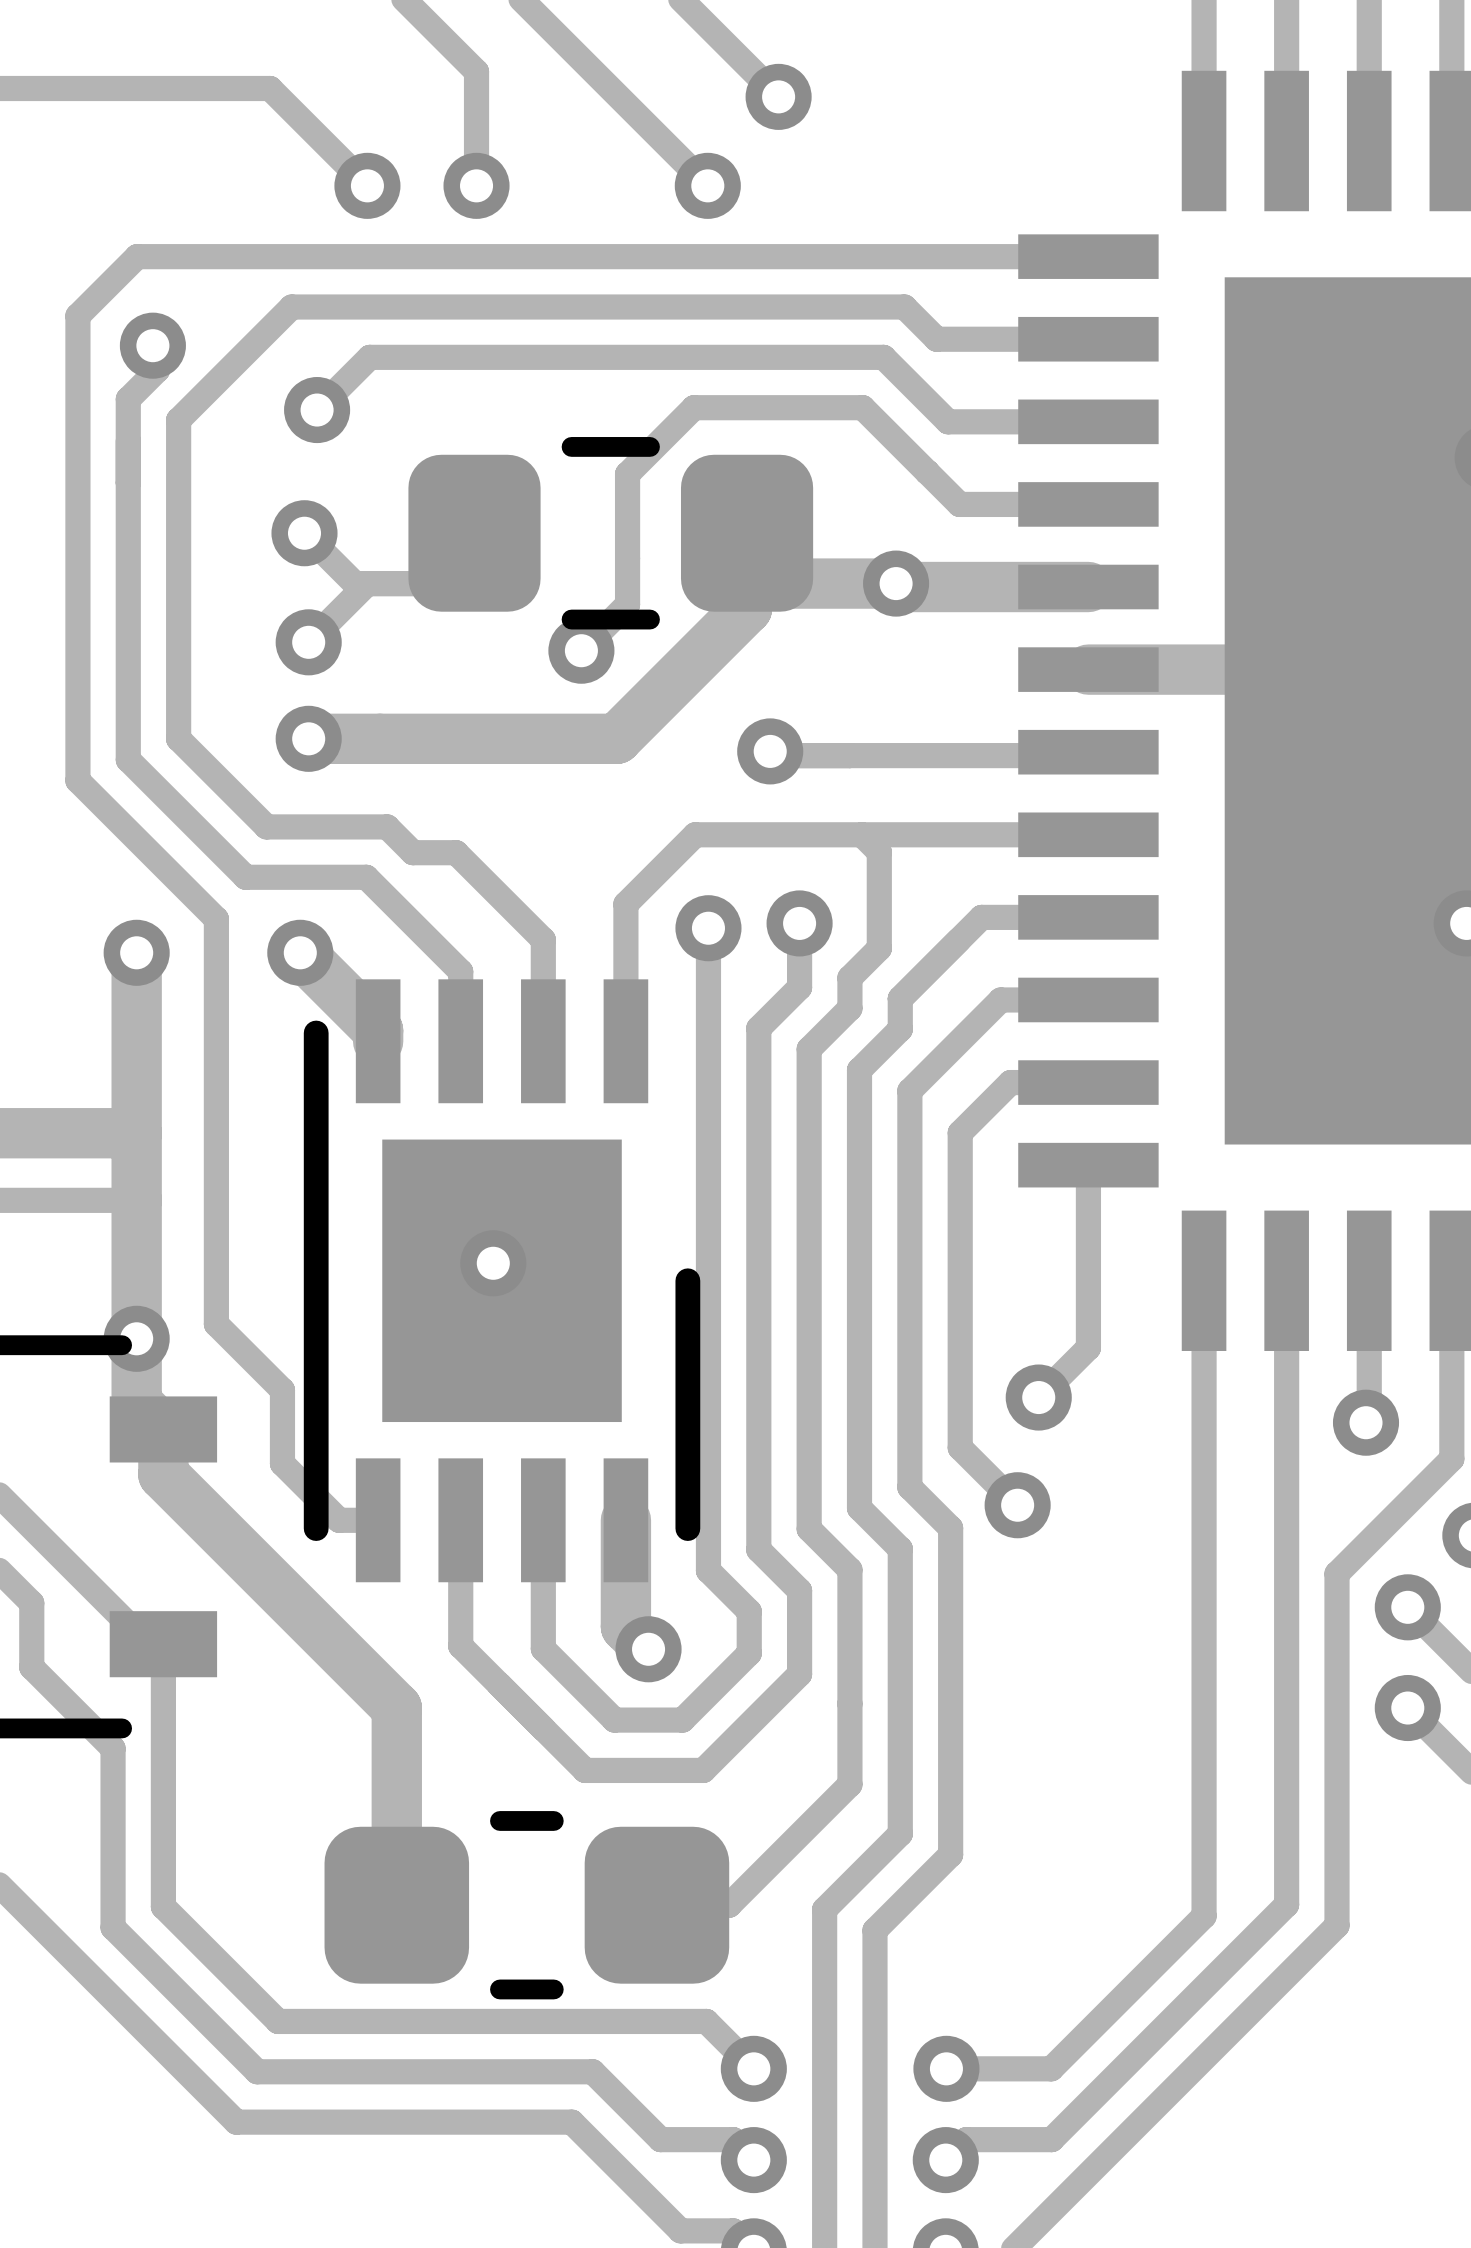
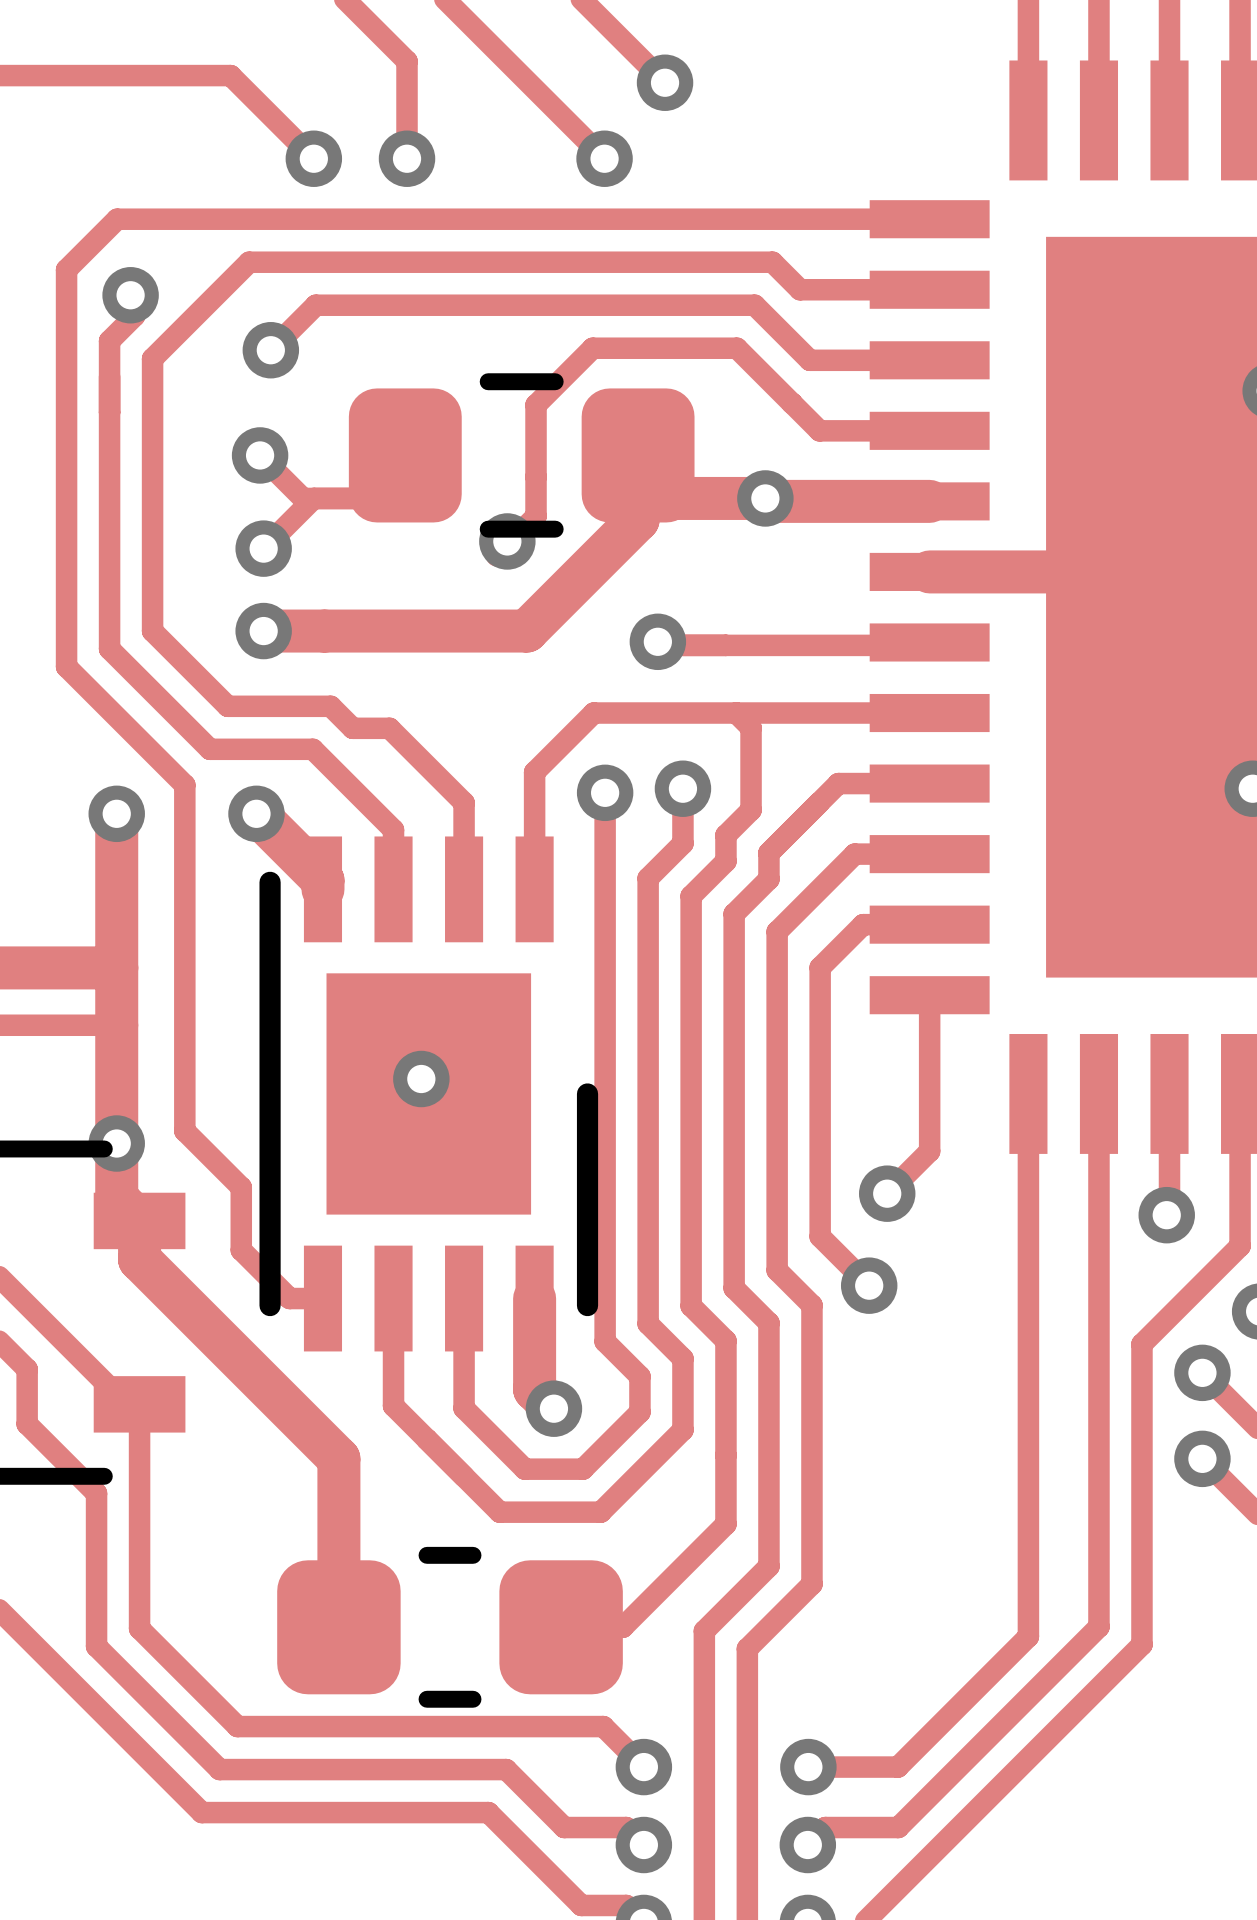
via position: (581, 650) -> (507, 541)

